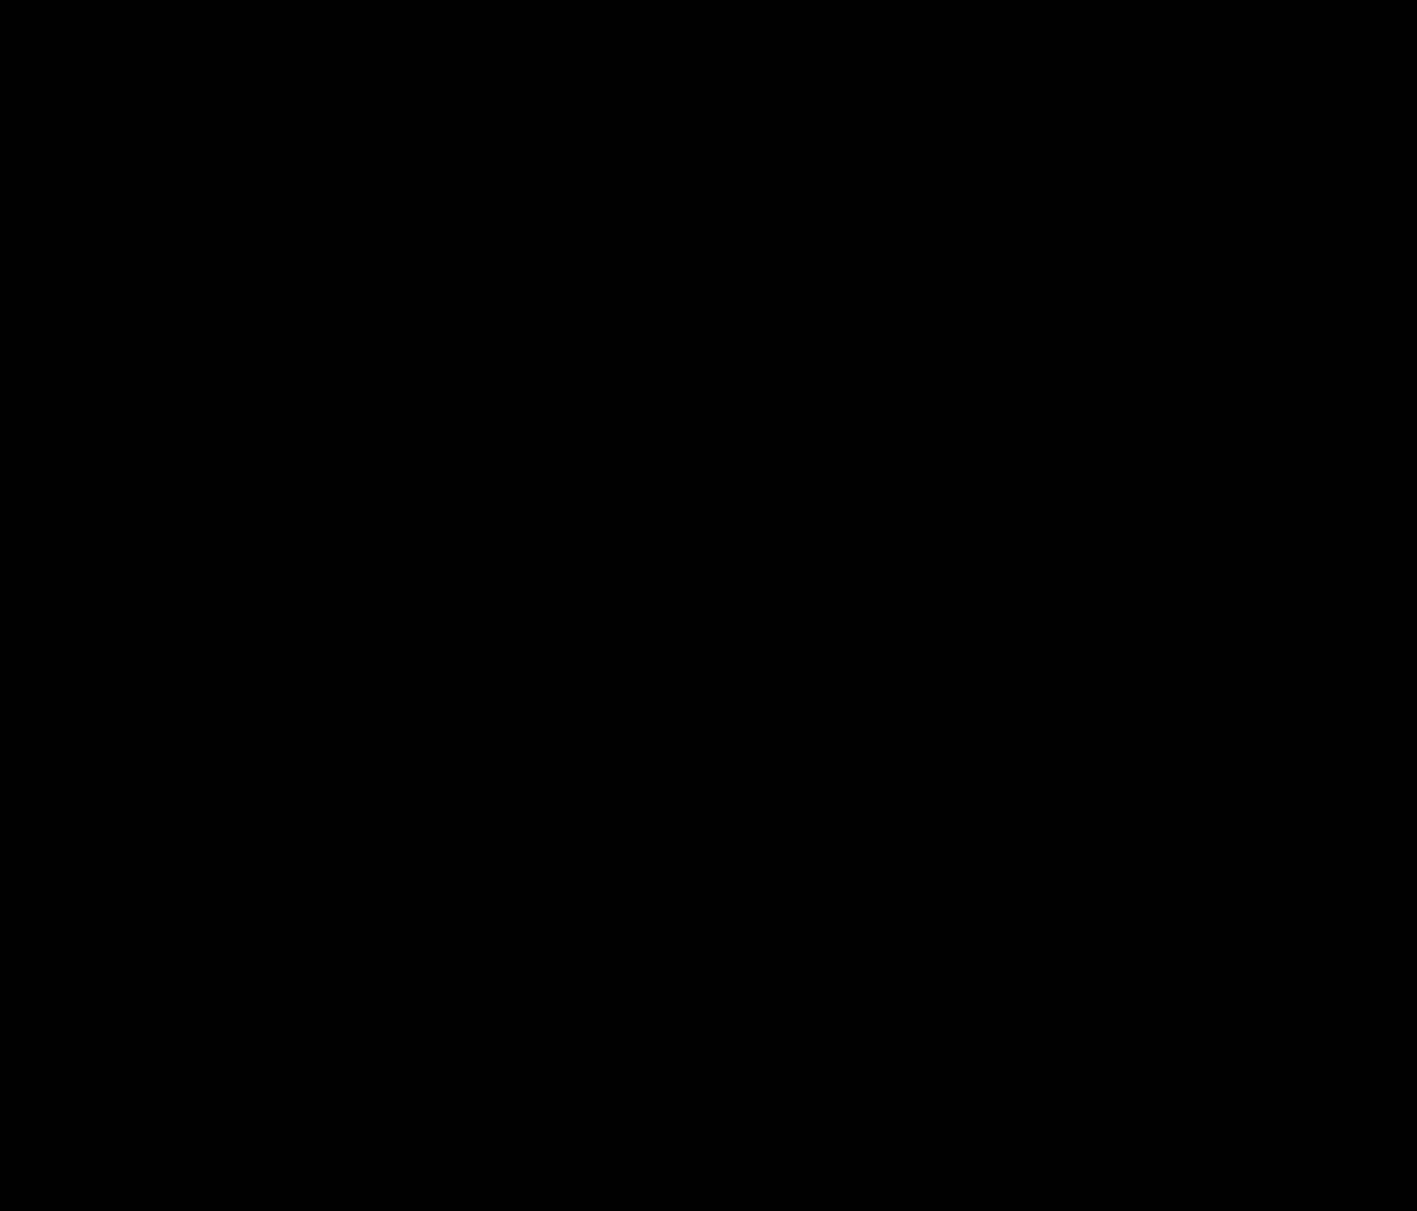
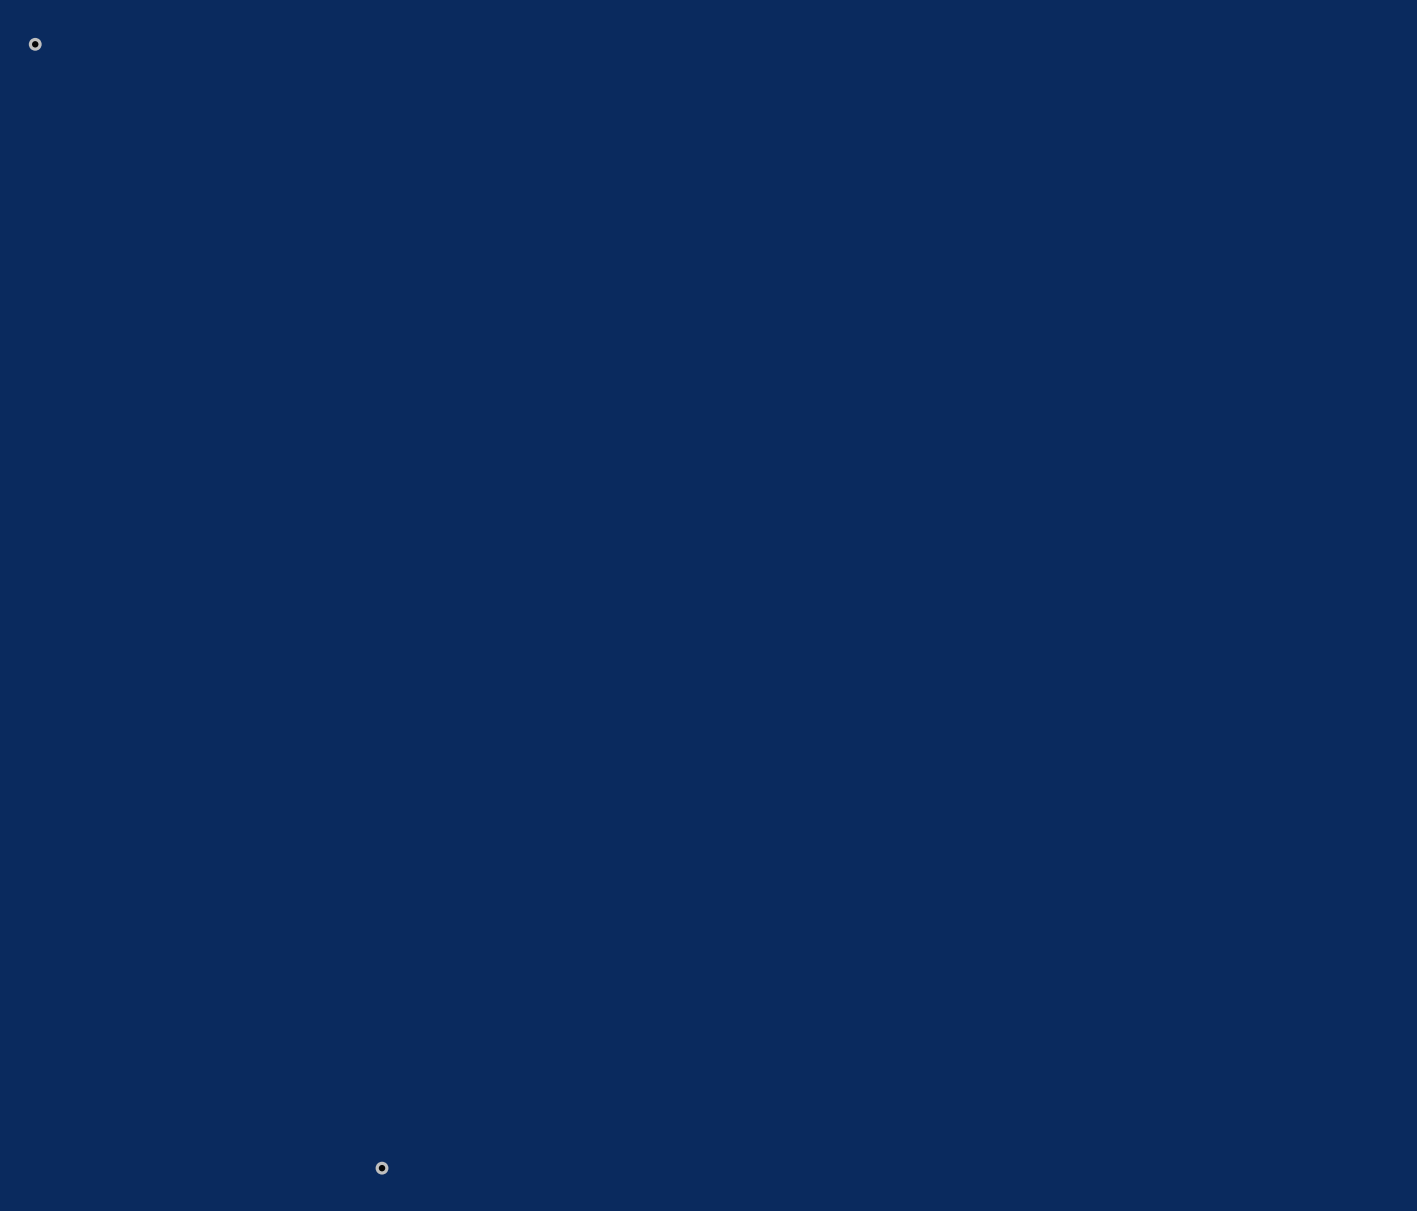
via: none -> (35, 44)
via: none -> (382, 1168)

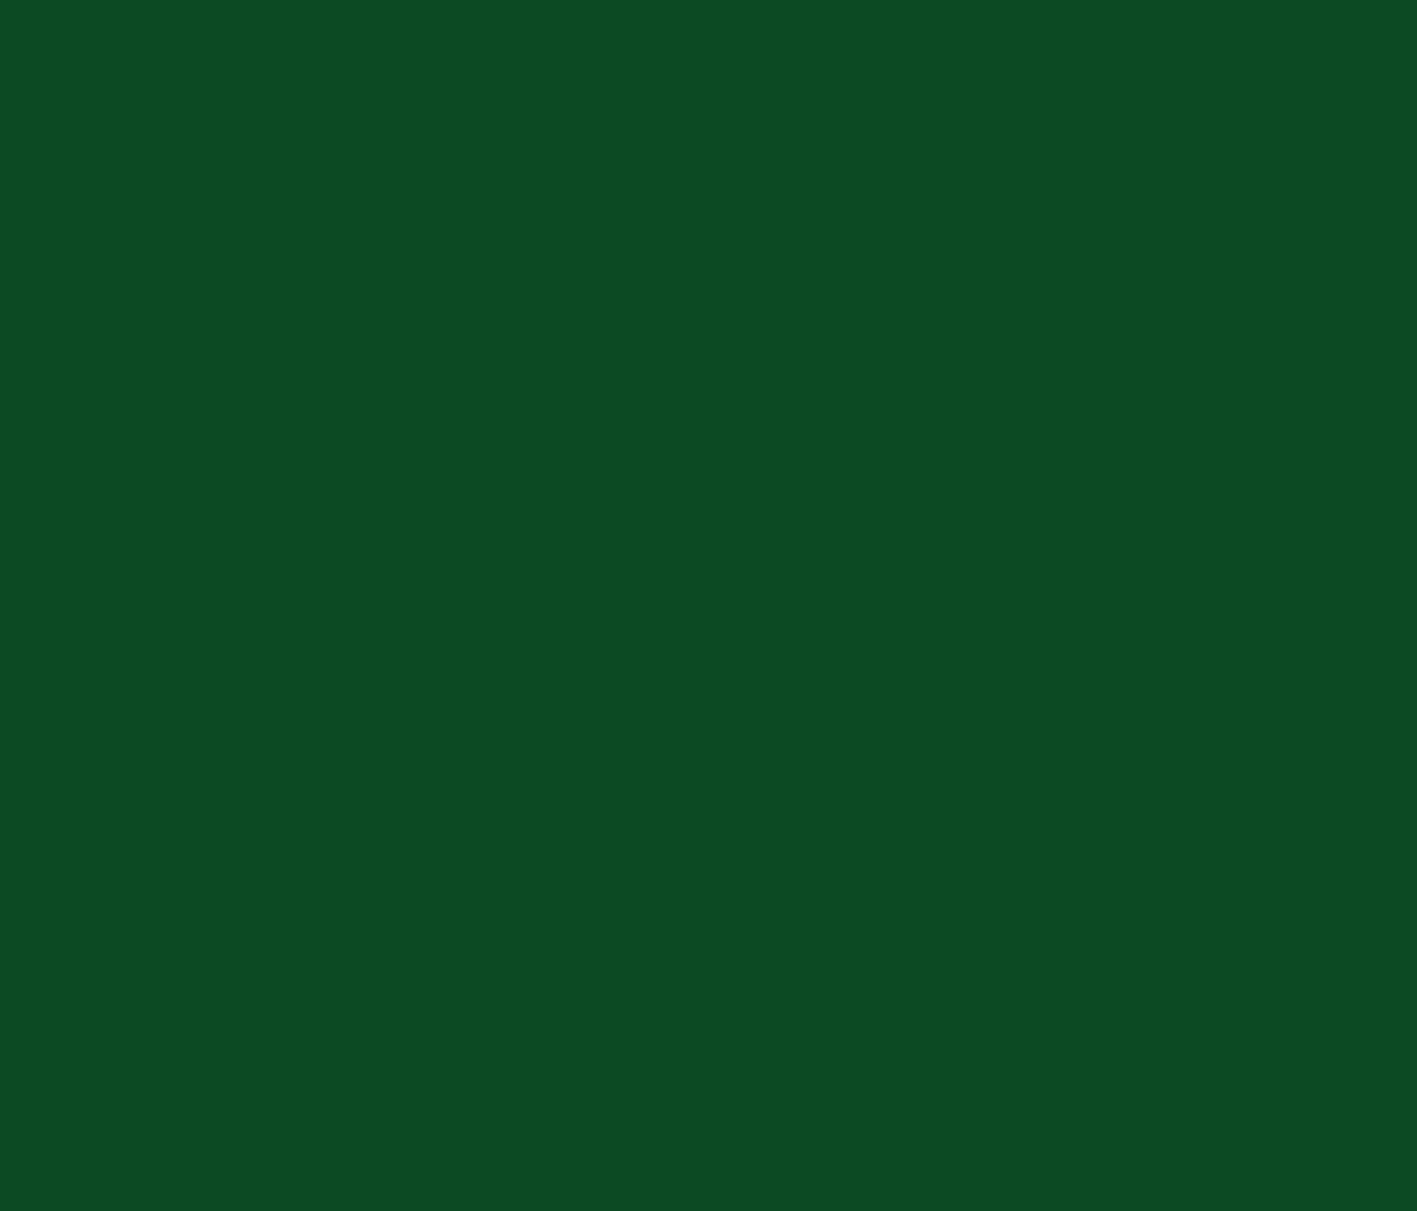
via: (35, 44) -> none
via: (382, 1168) -> none

